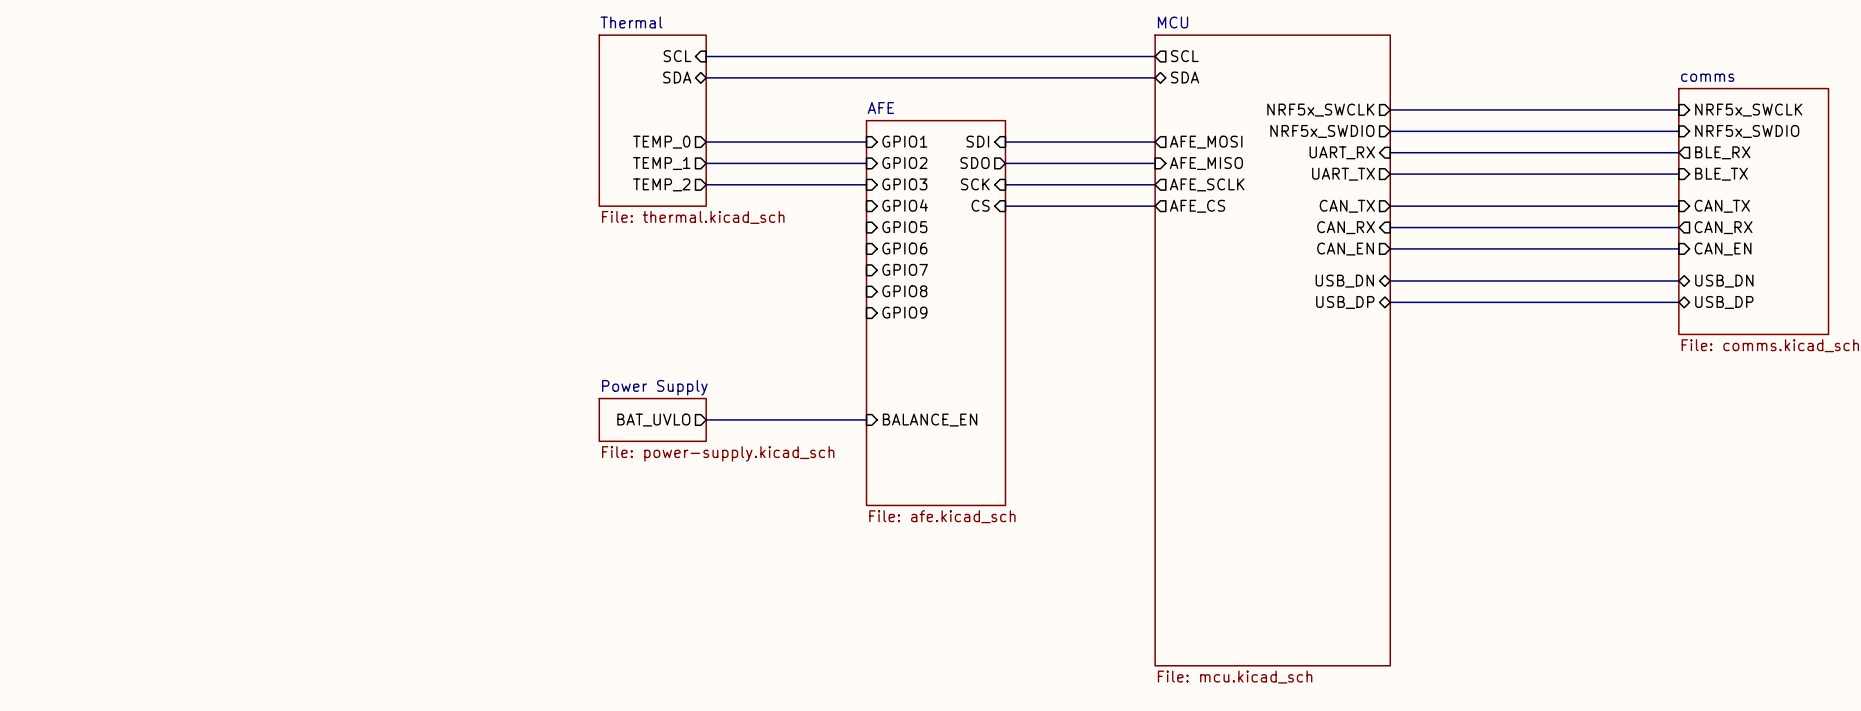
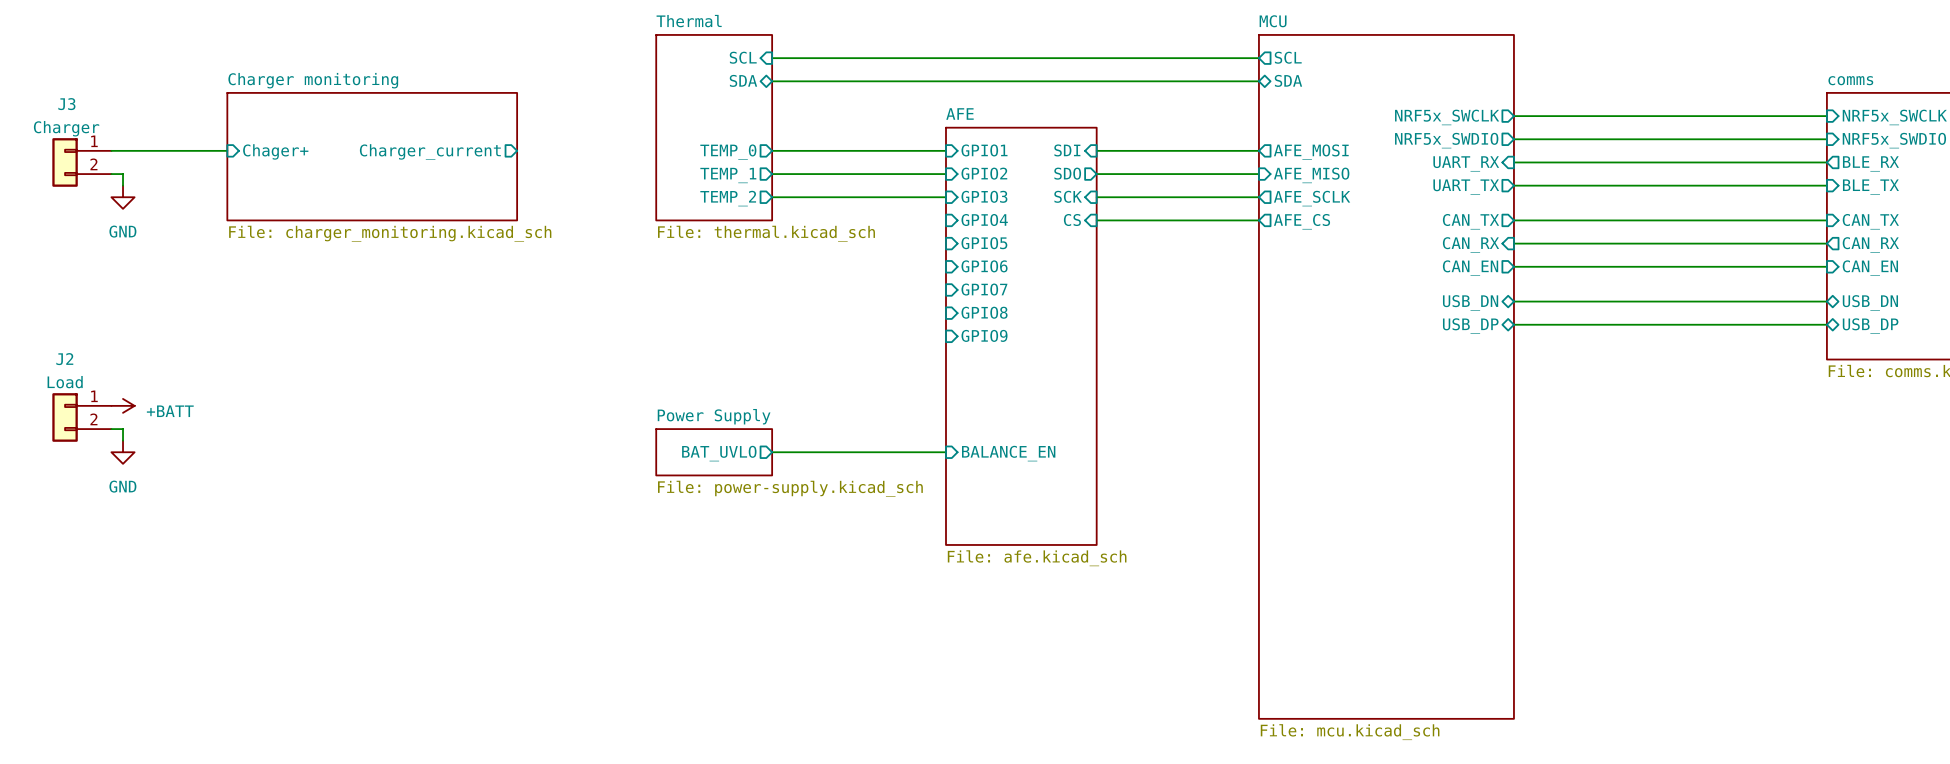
wire: none -> (111, 150) (227, 150)
sheet pin: none -> Chager+ (275, 151)
sheet pin: none -> Charger_current (430, 152)
sheet Charger monitoring: none -> File: charger_monitoring.kicad_sch (372, 156)
J3: none -> Charger (81, 162)
wire: none -> (111, 174) (123, 174) (123, 185)
power symbol: none -> GND (123, 197)
power symbol: none -> +BATT (123, 405)
J2: none -> Load (81, 417)
wire: none -> (111, 429) (123, 429) (123, 440)
power symbol: none -> GND (123, 452)

